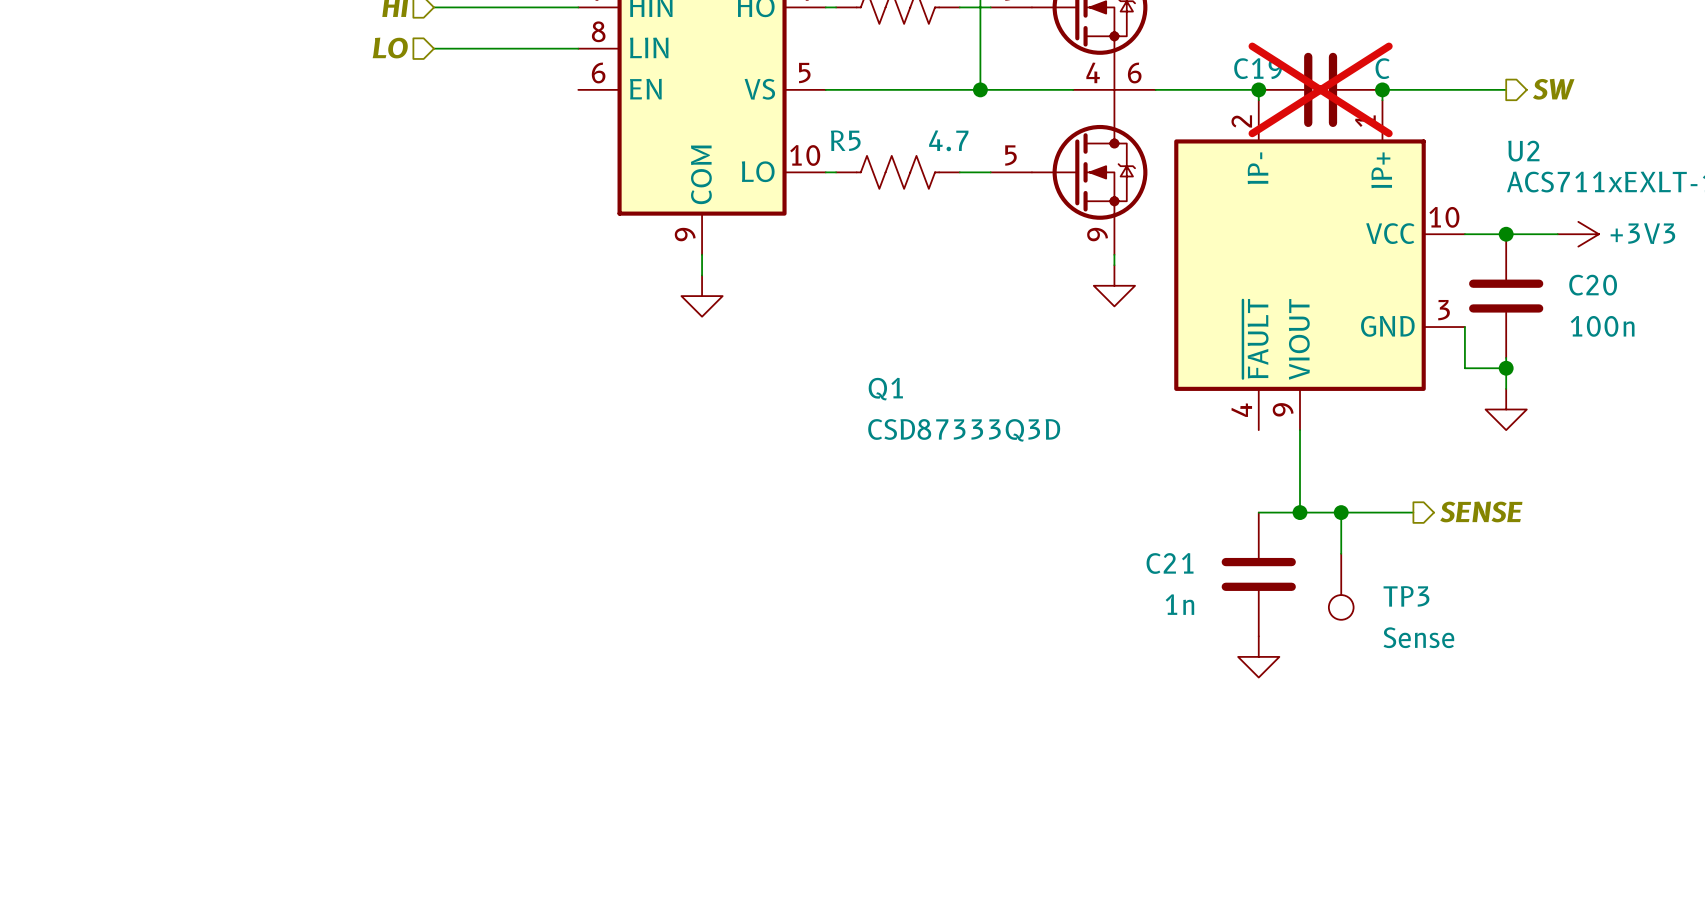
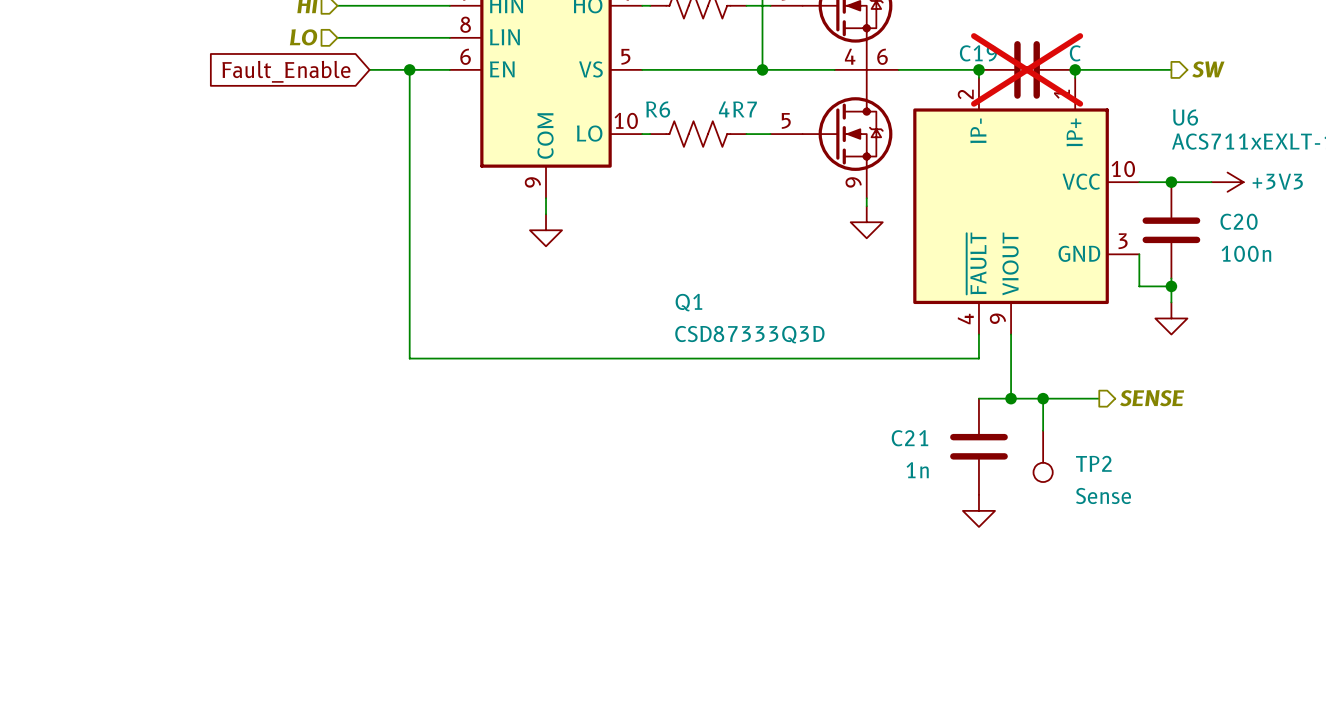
wire: none -> (369, 69) (449, 69)
wire: none -> (409, 69) (409, 358) (978, 358) (978, 334)
junction: none -> (409, 69)
global label: none -> Fault_Enable (286, 71)
R5 name: R5 (845, 140) -> R6 (658, 109)
R5 value: 4.7 (948, 140) -> 4R7 (737, 109)
U2 name: U2 (1523, 151) -> U6 (1185, 117)
TP3 name: TP3 (1406, 596) -> TP2 (1093, 463)

